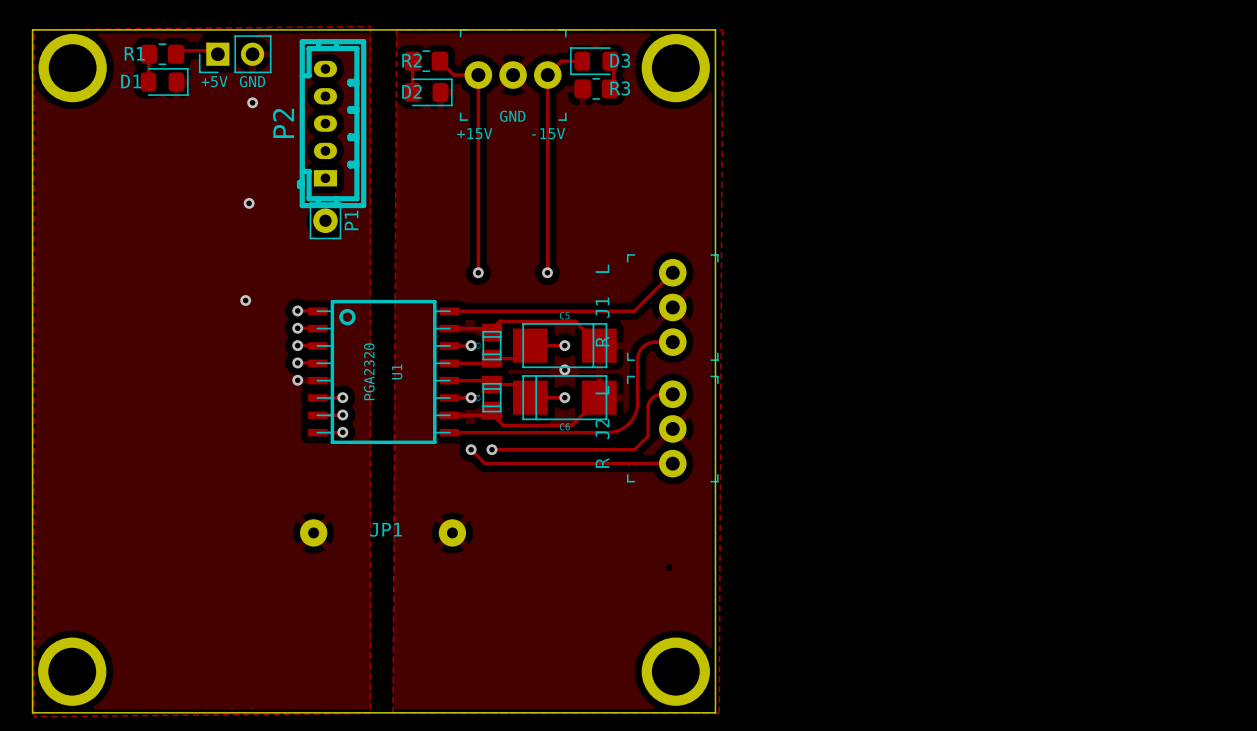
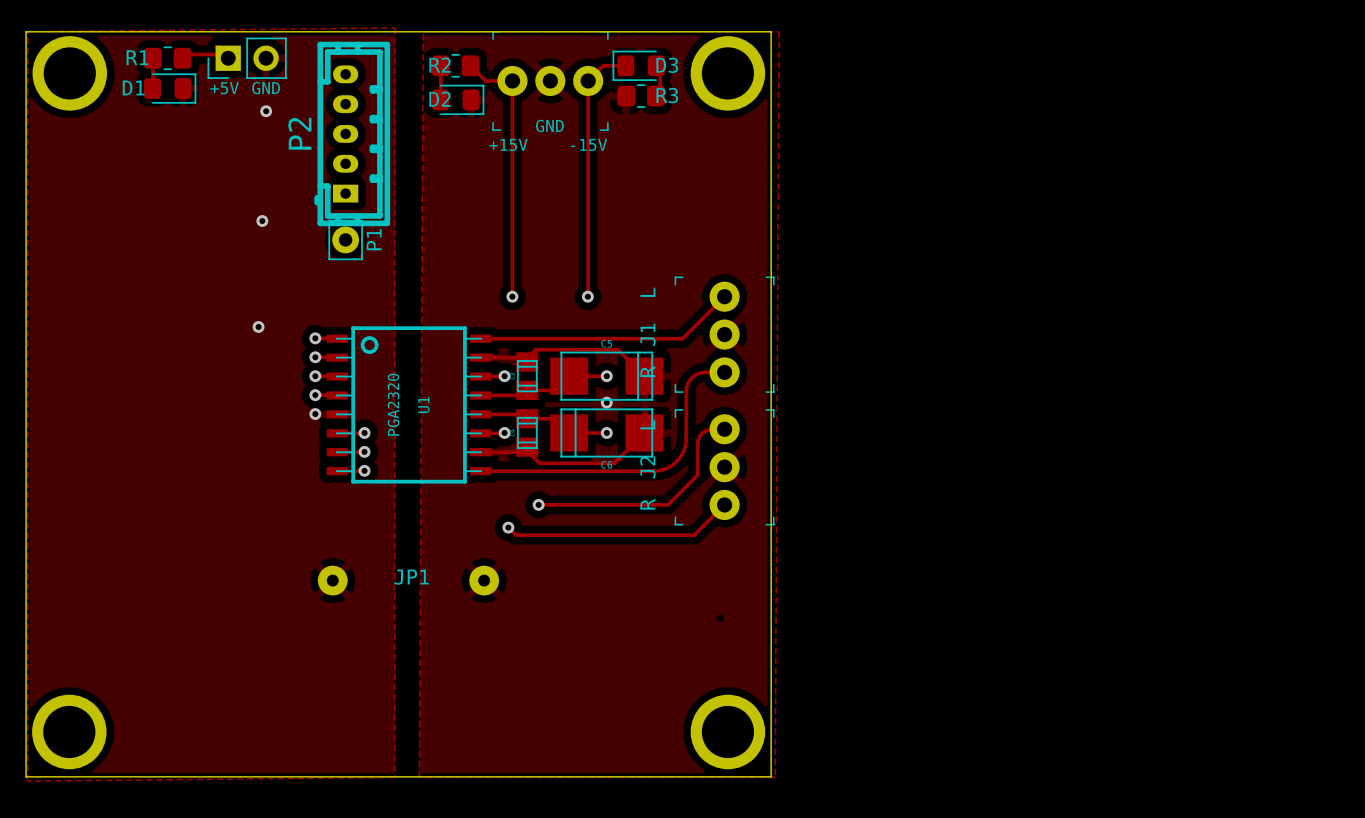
track: (471, 449) (485, 463) (502, 463) -> none
via: (471, 449) -> none
track: (491, 449) (634, 449) -> none
via: (491, 449) -> none
via: none -> (538, 504)
track: (620, 463) (672, 463) -> (667, 504) (682, 489)
track: none -> (724, 504) (694, 535) (515, 535) (508, 527)
via: none -> (508, 527)

